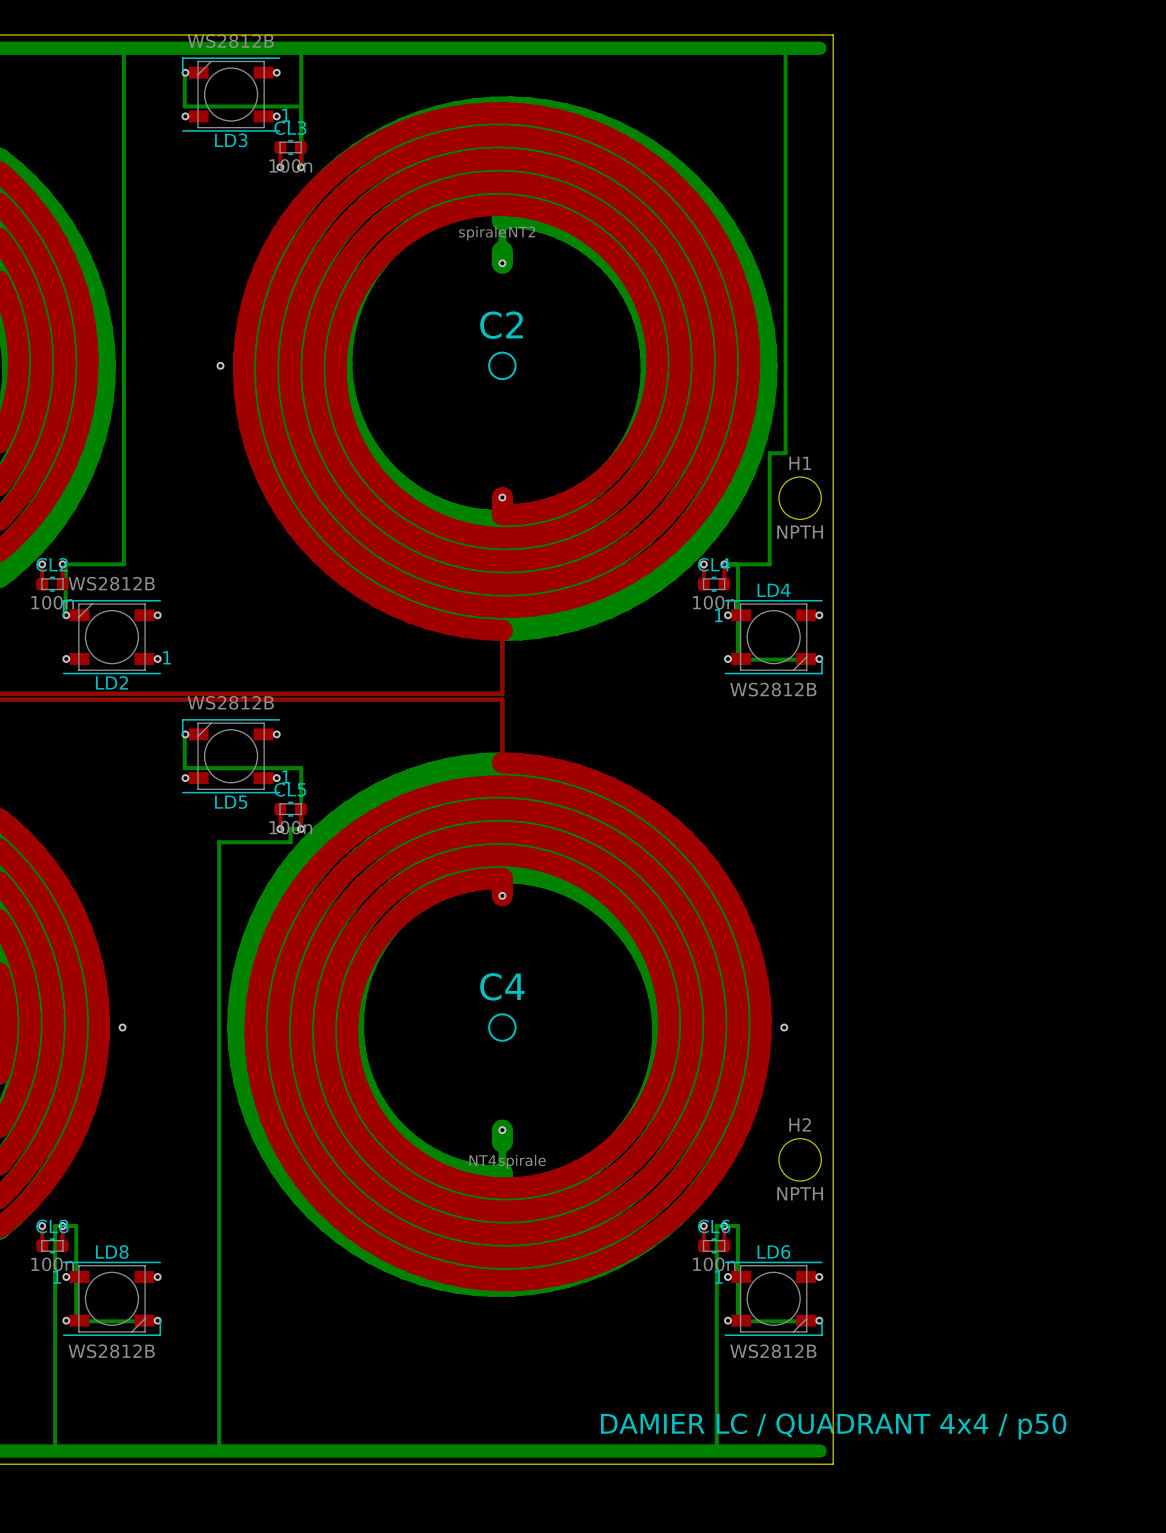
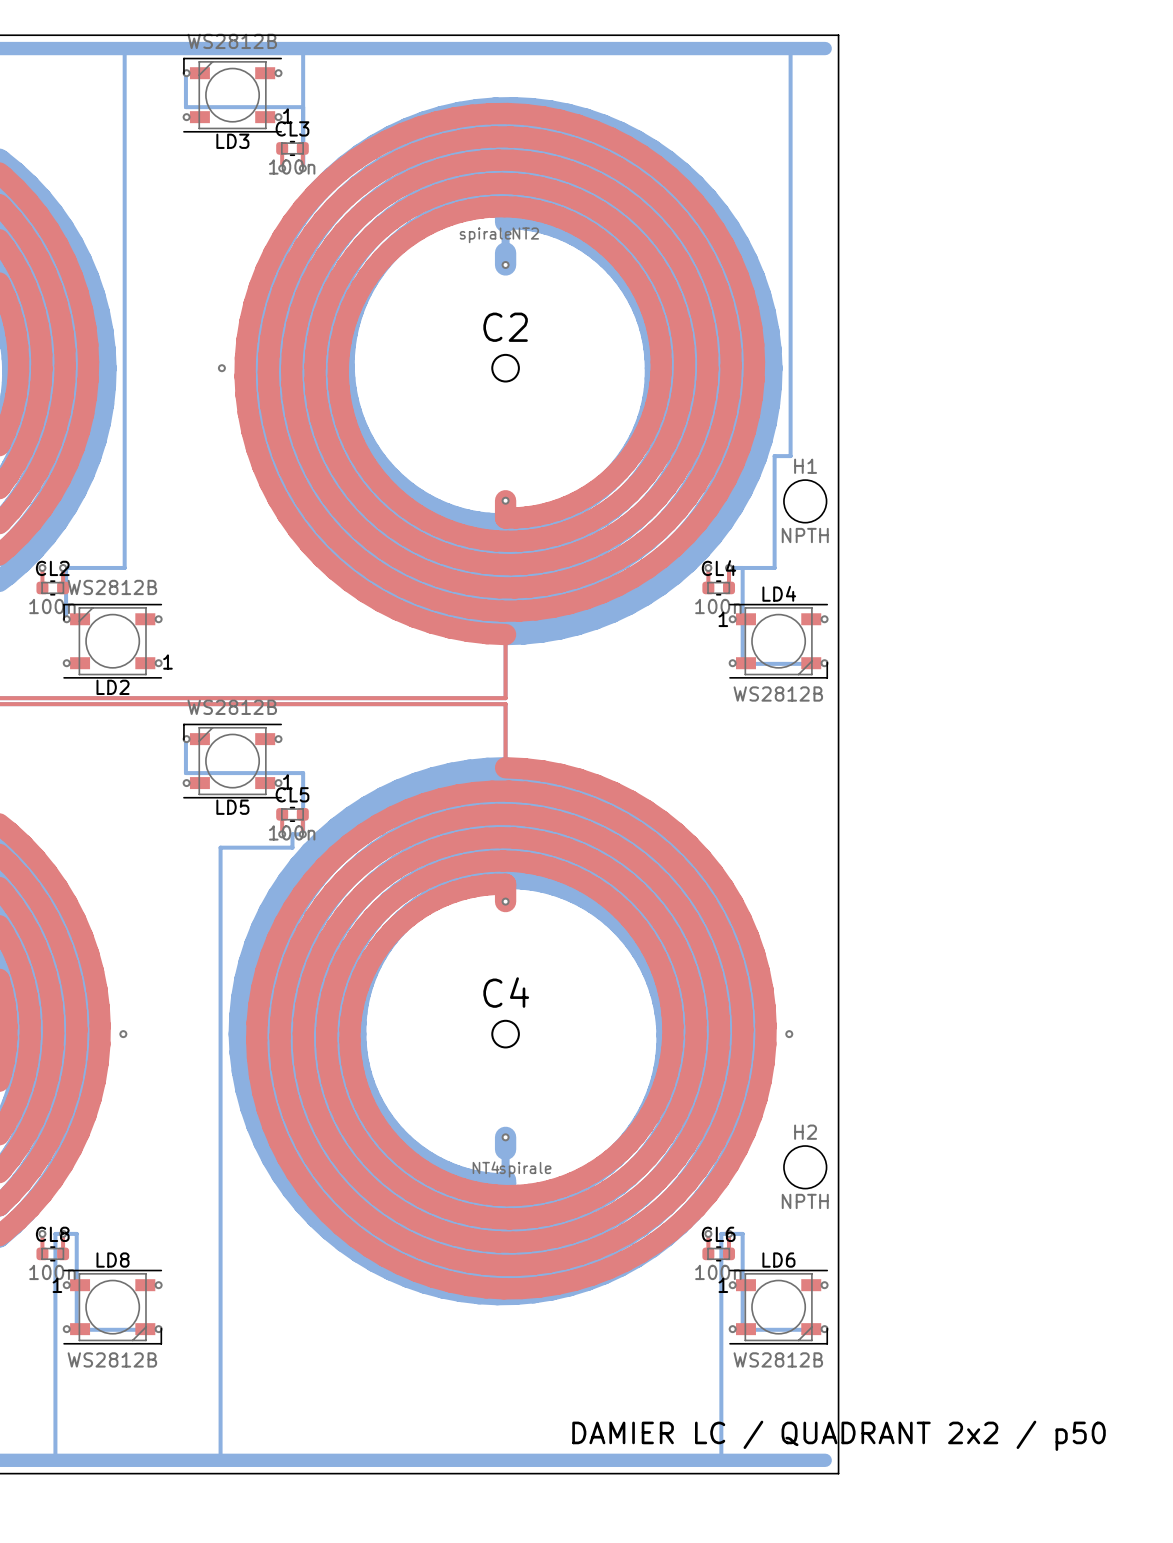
text: DAMIER LC / QUADRANT 4x4 / p50 (833, 1426) -> DAMIER LC / QUADRANT 2x2 / p50 (839, 1435)

